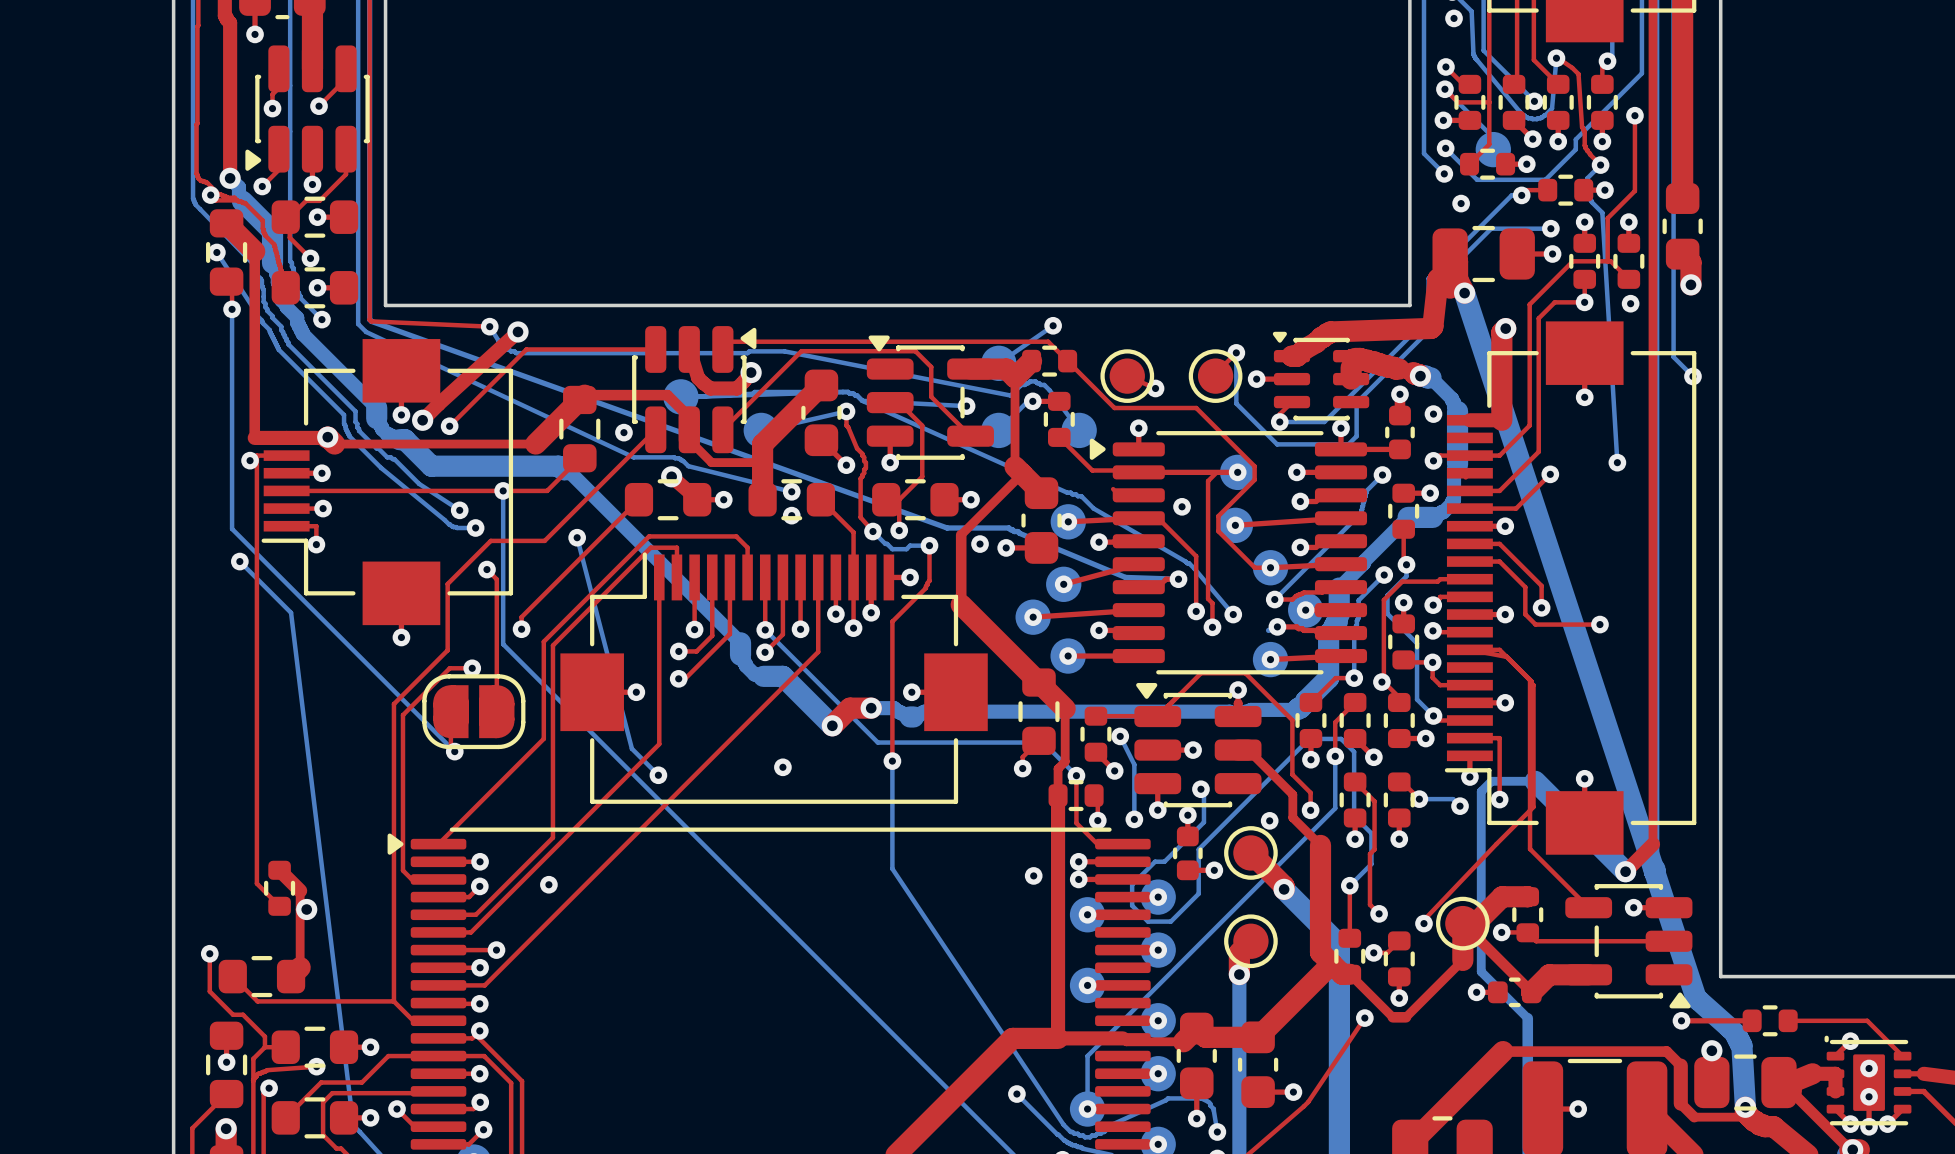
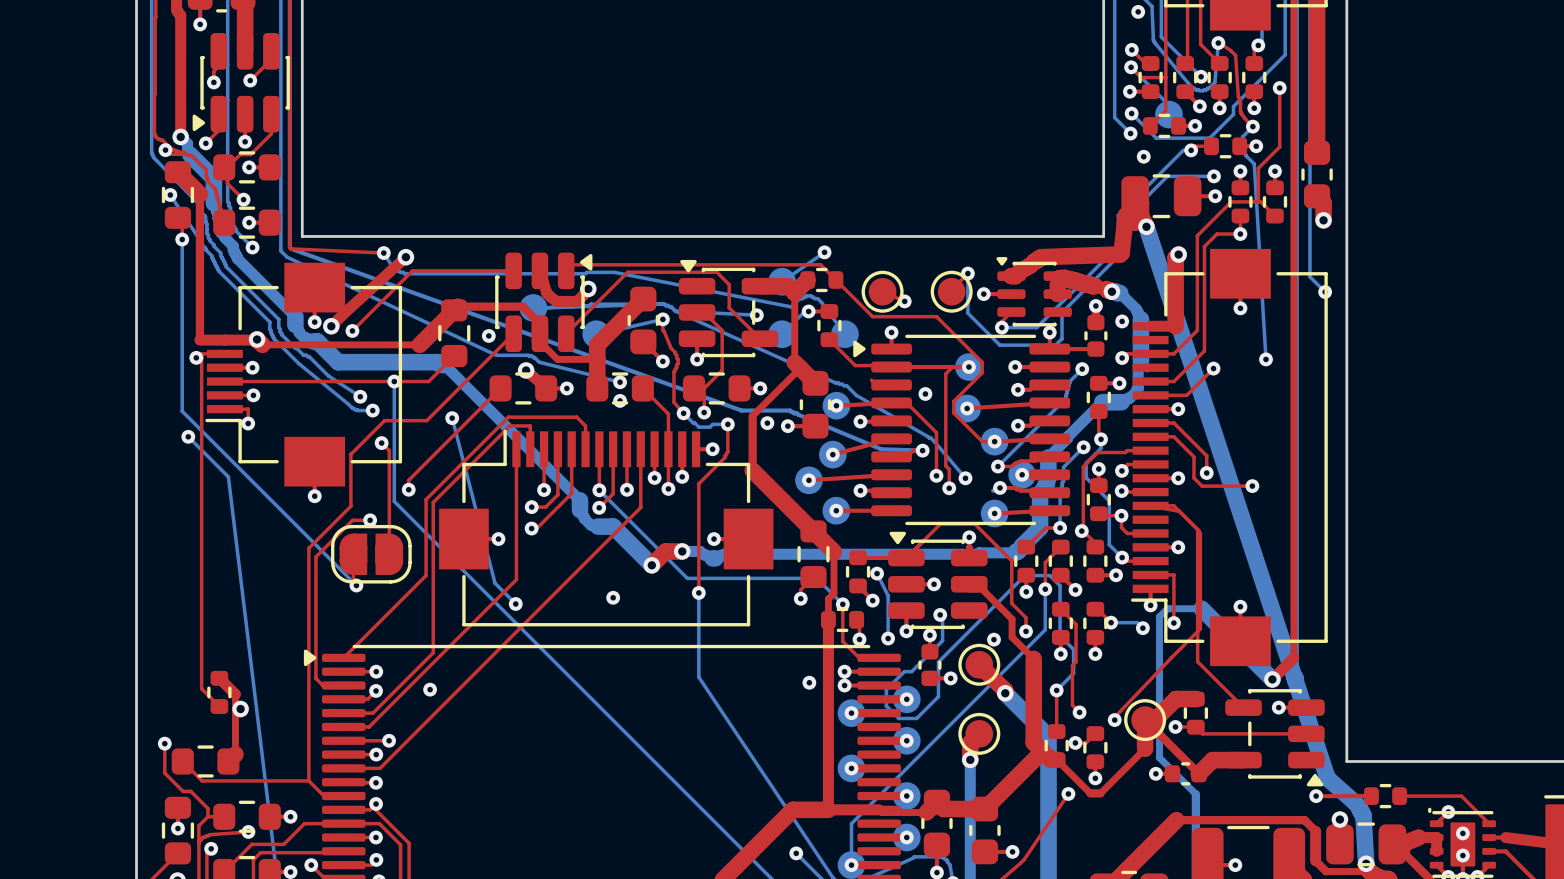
via: (1630, 303) -> none

